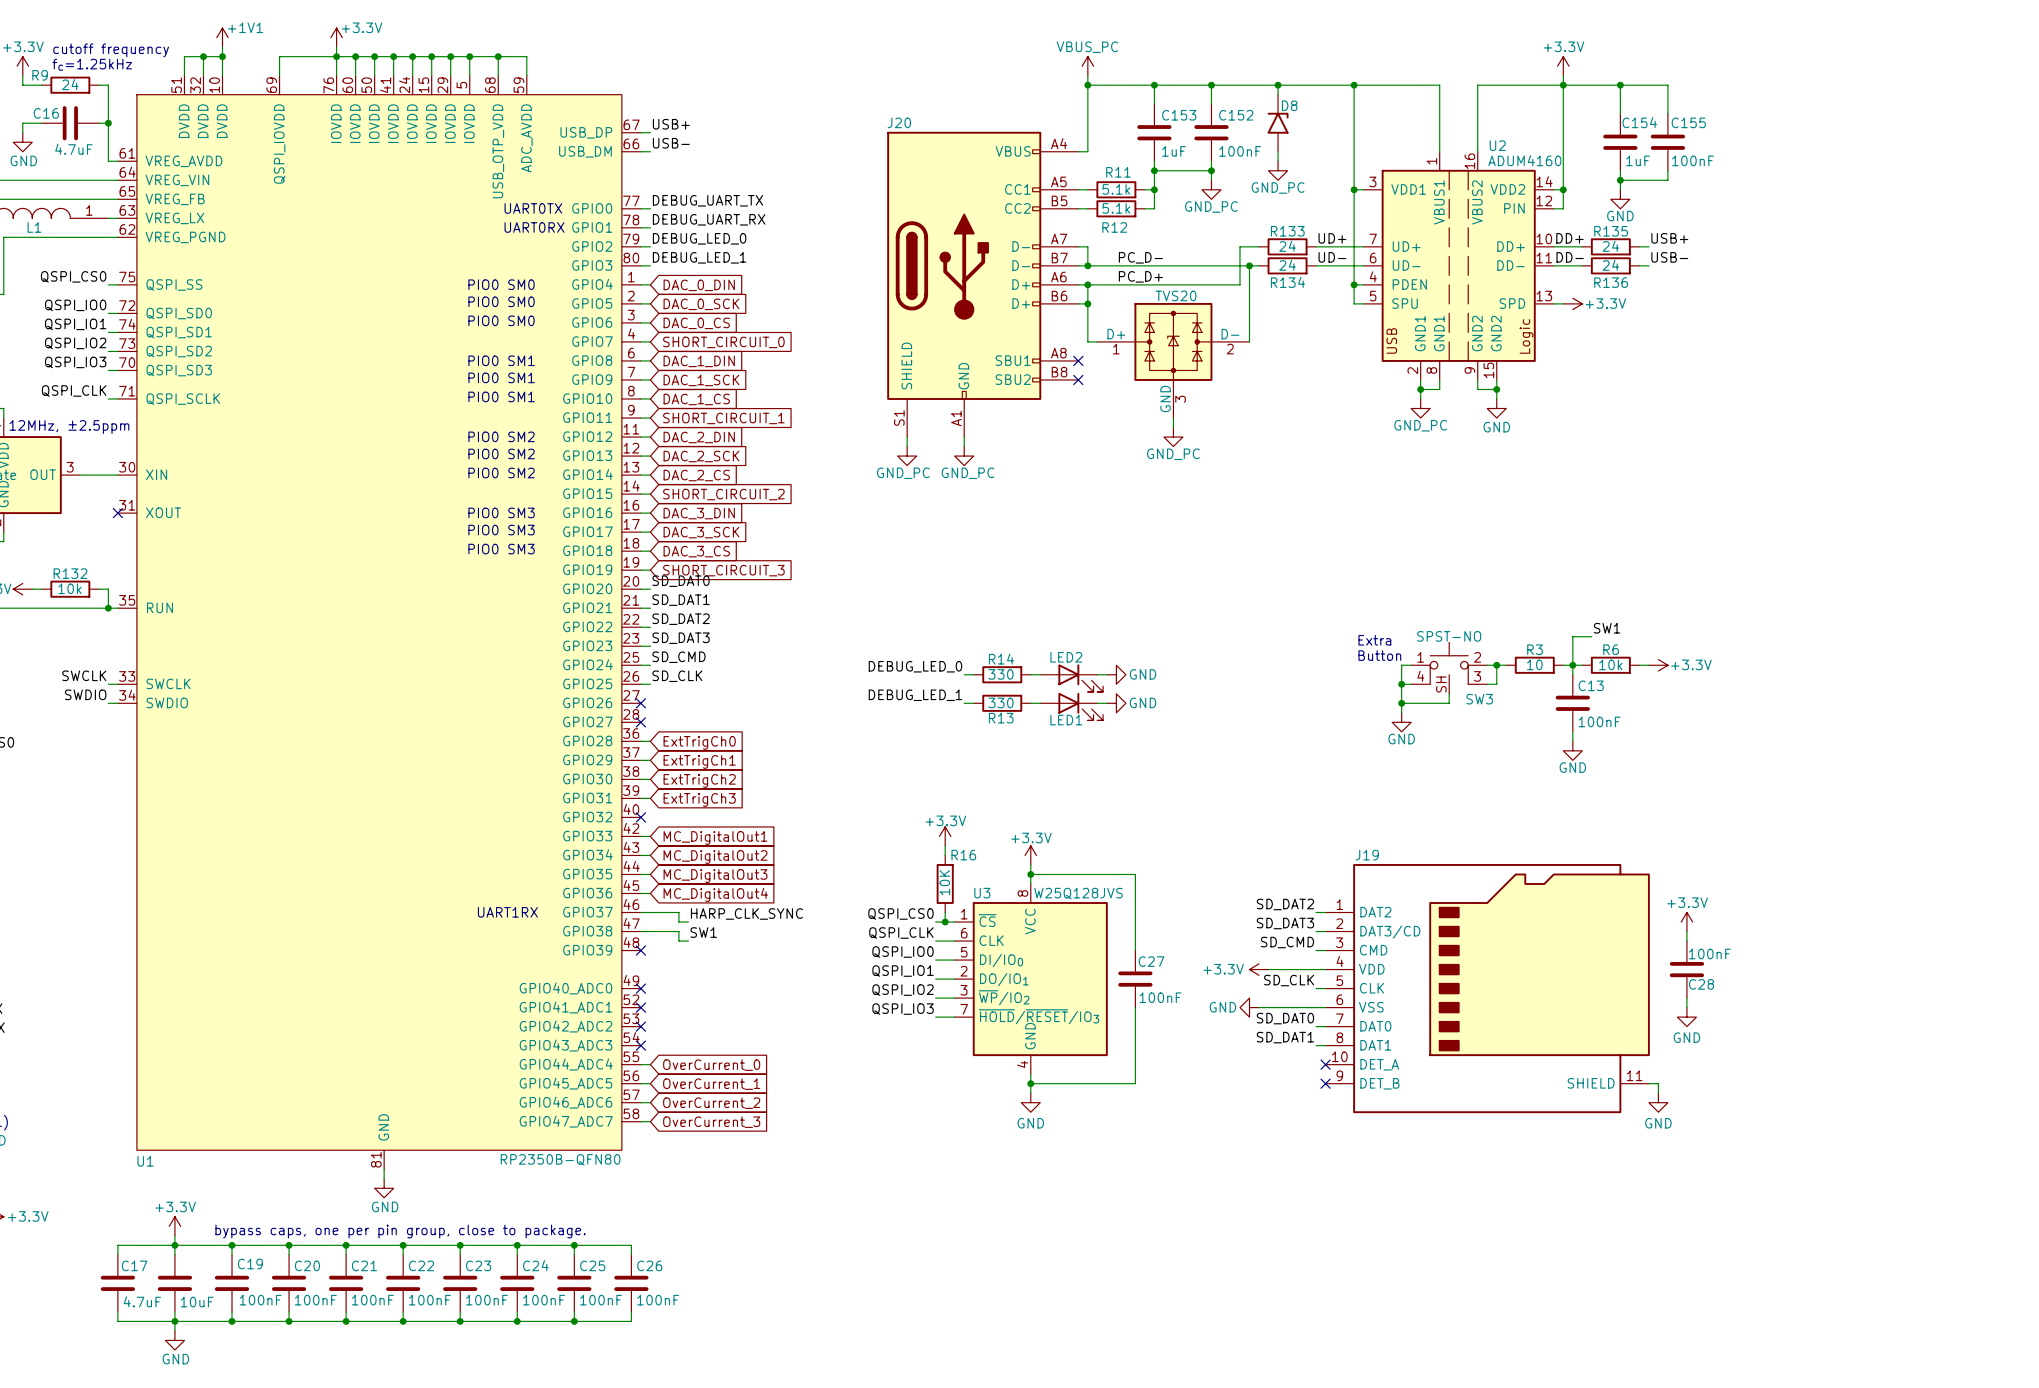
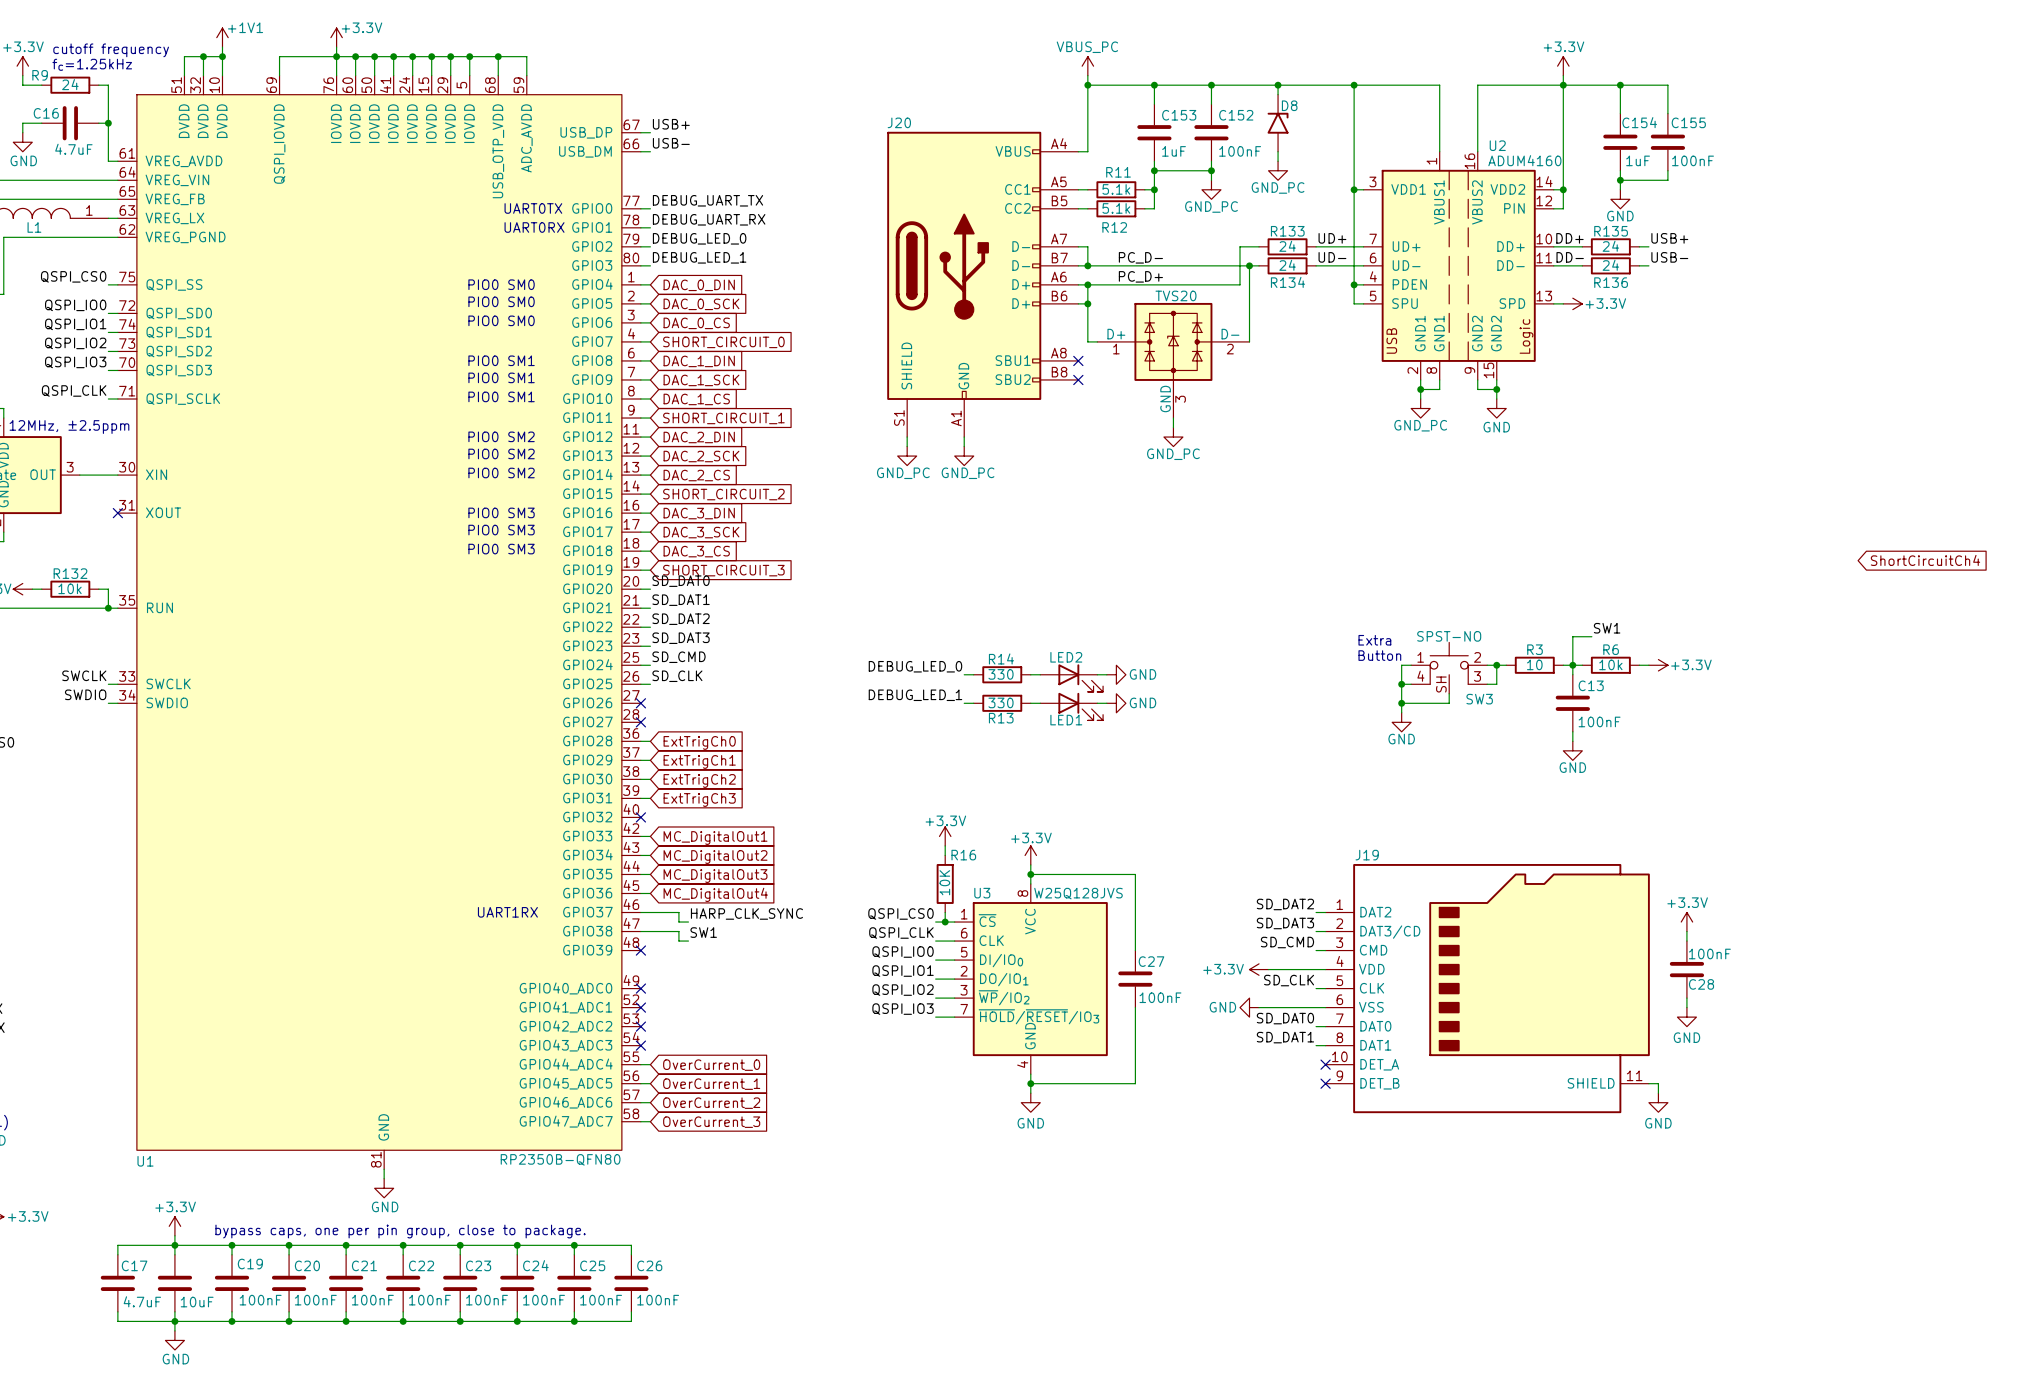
global label: none -> ShortCircuitCh4 (1925, 560)

